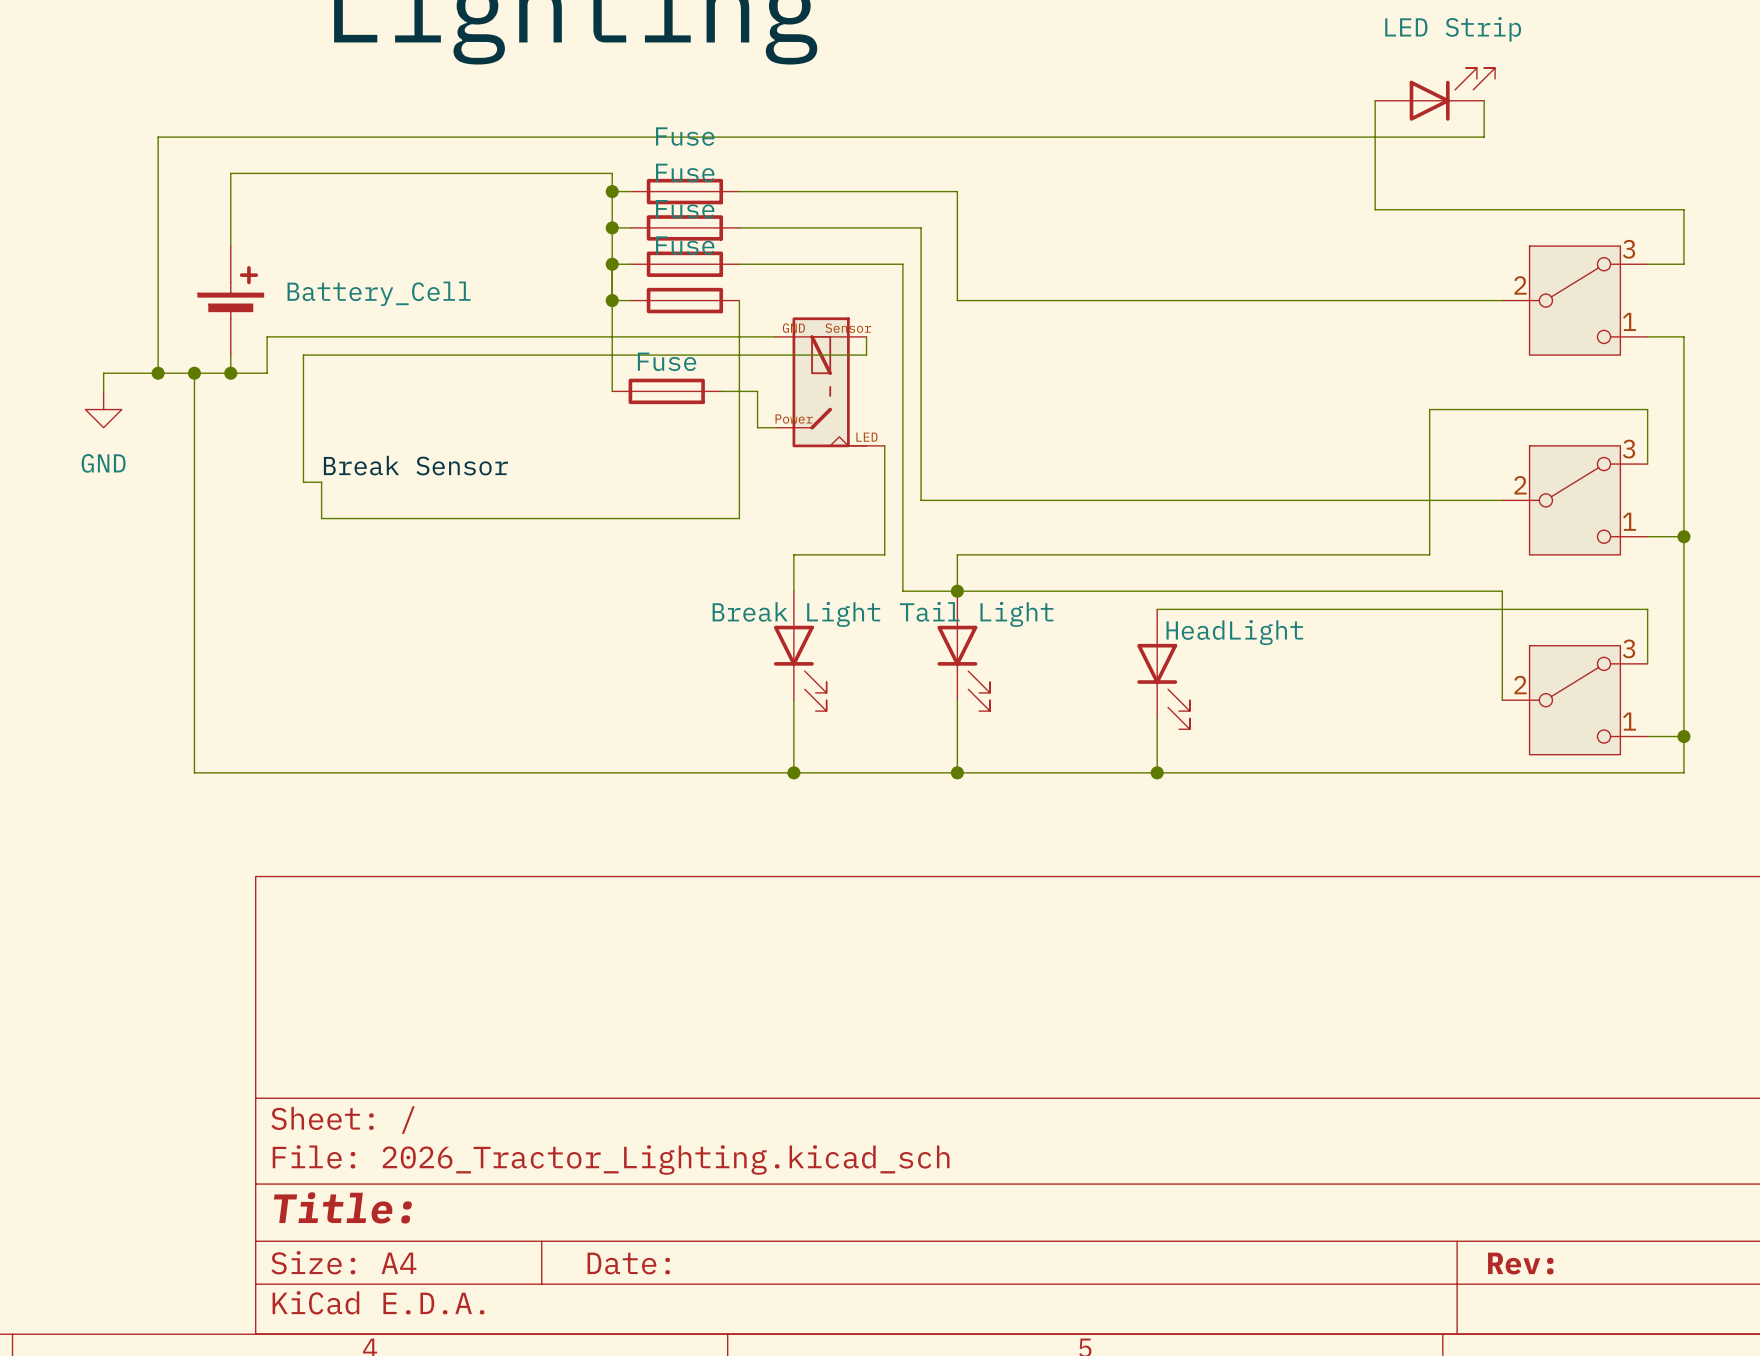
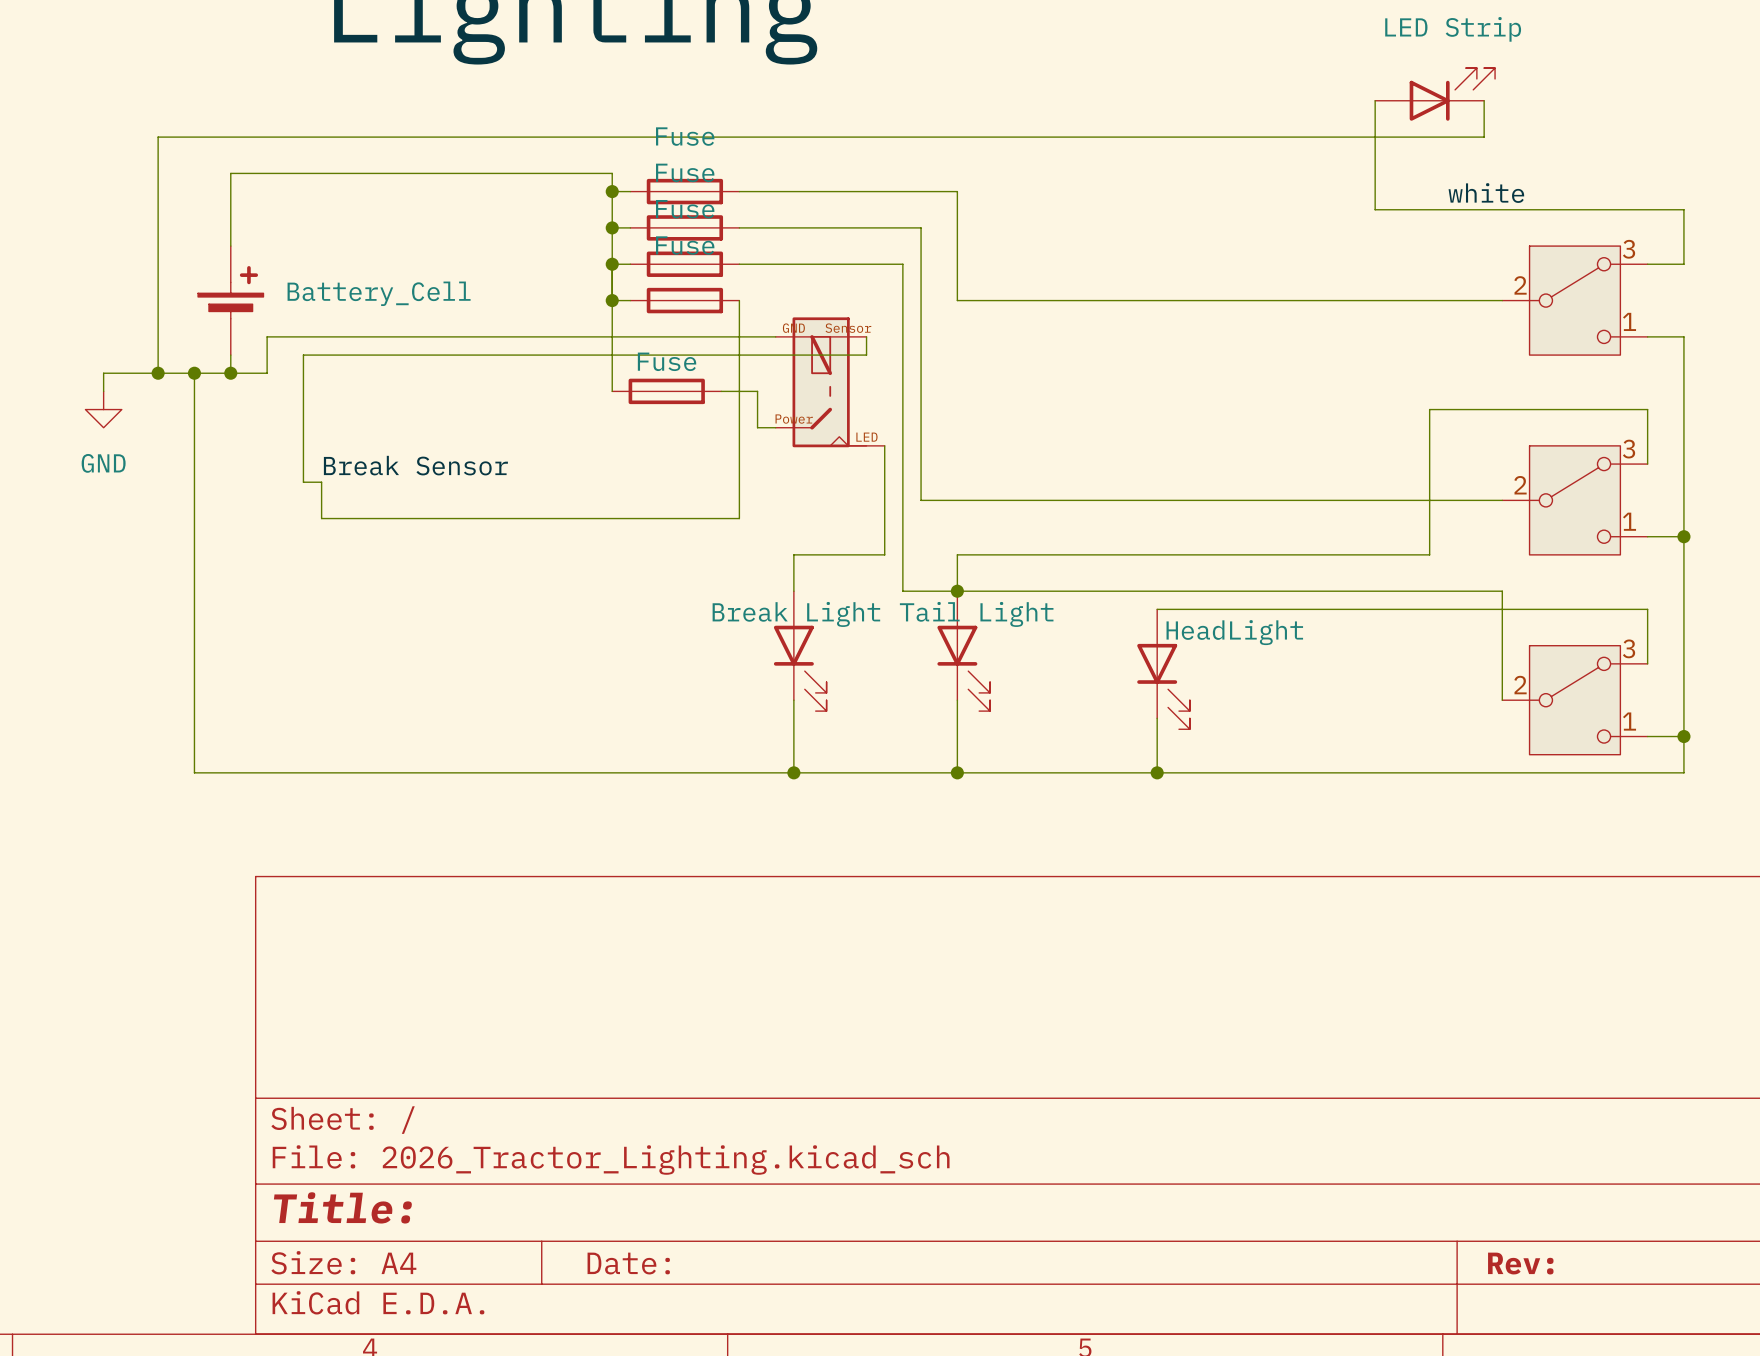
label: none -> white (1486, 193)

